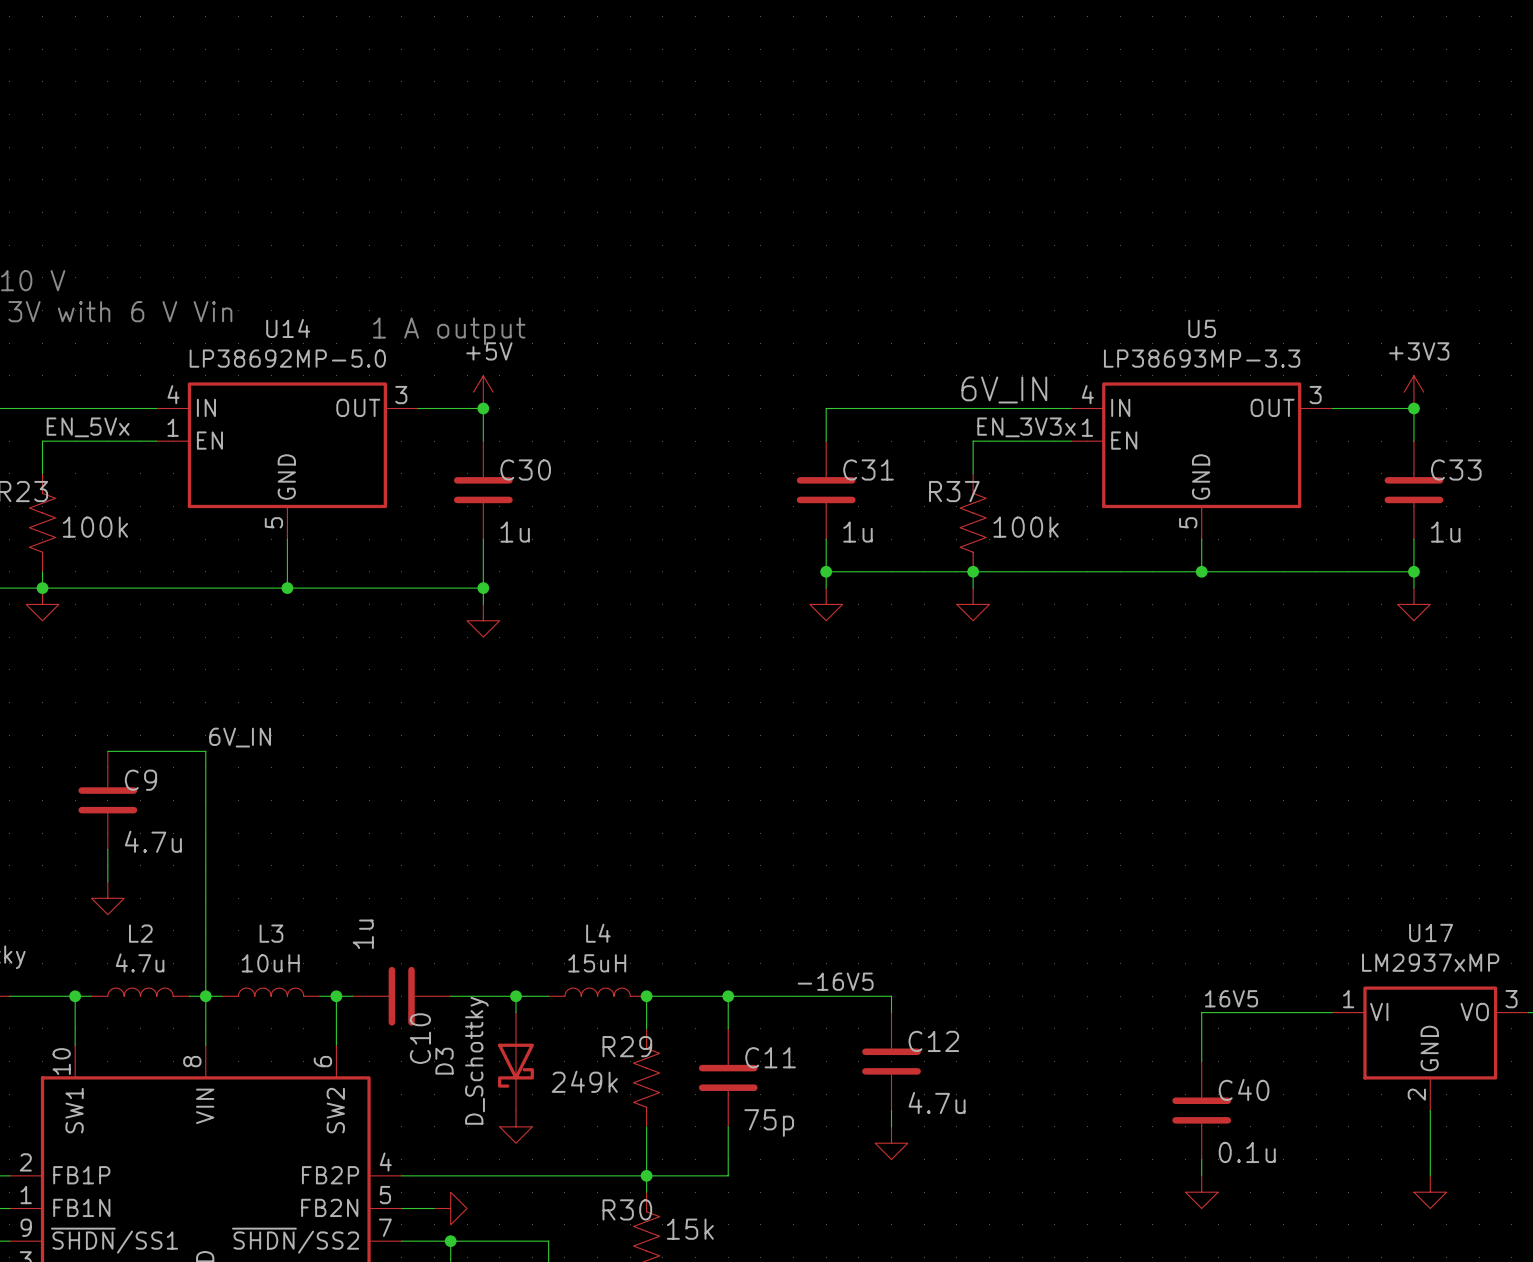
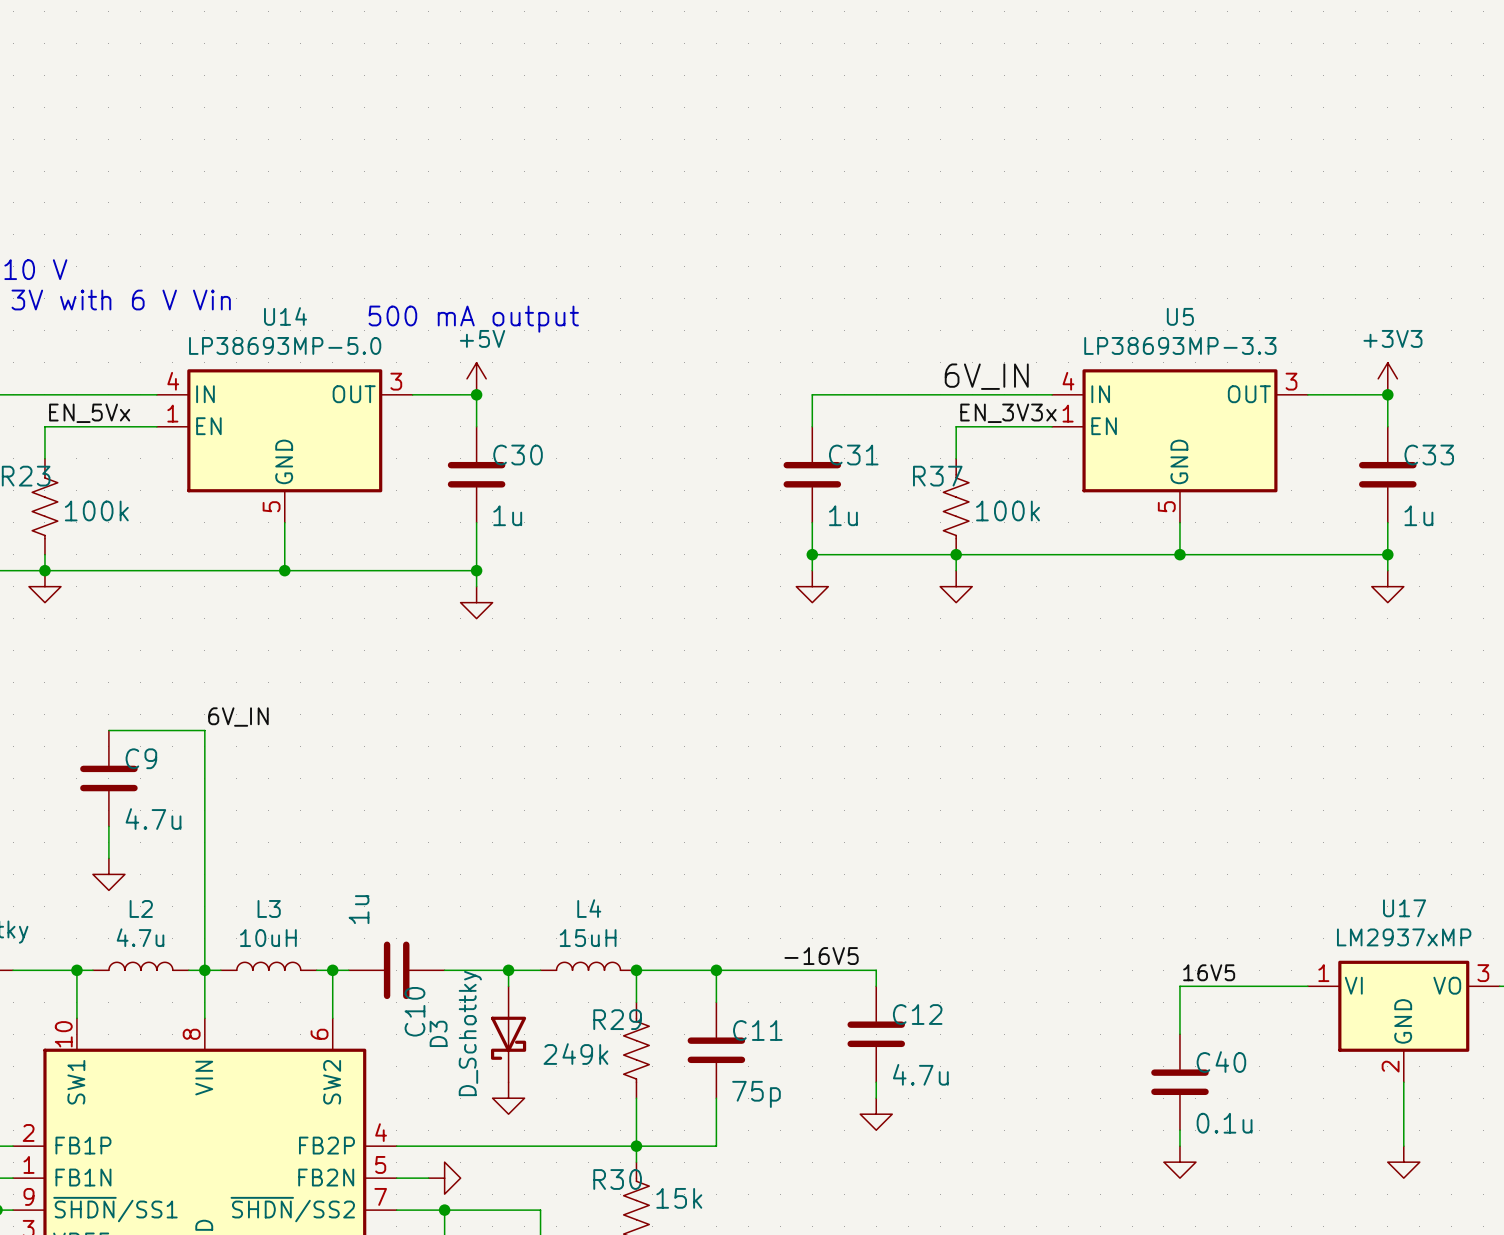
text: 1 A output (449, 331) -> 500 mA output (473, 319)
U14 value: LP38692MP-5.0 (287, 358) -> LP38693MP-5.0 (285, 345)

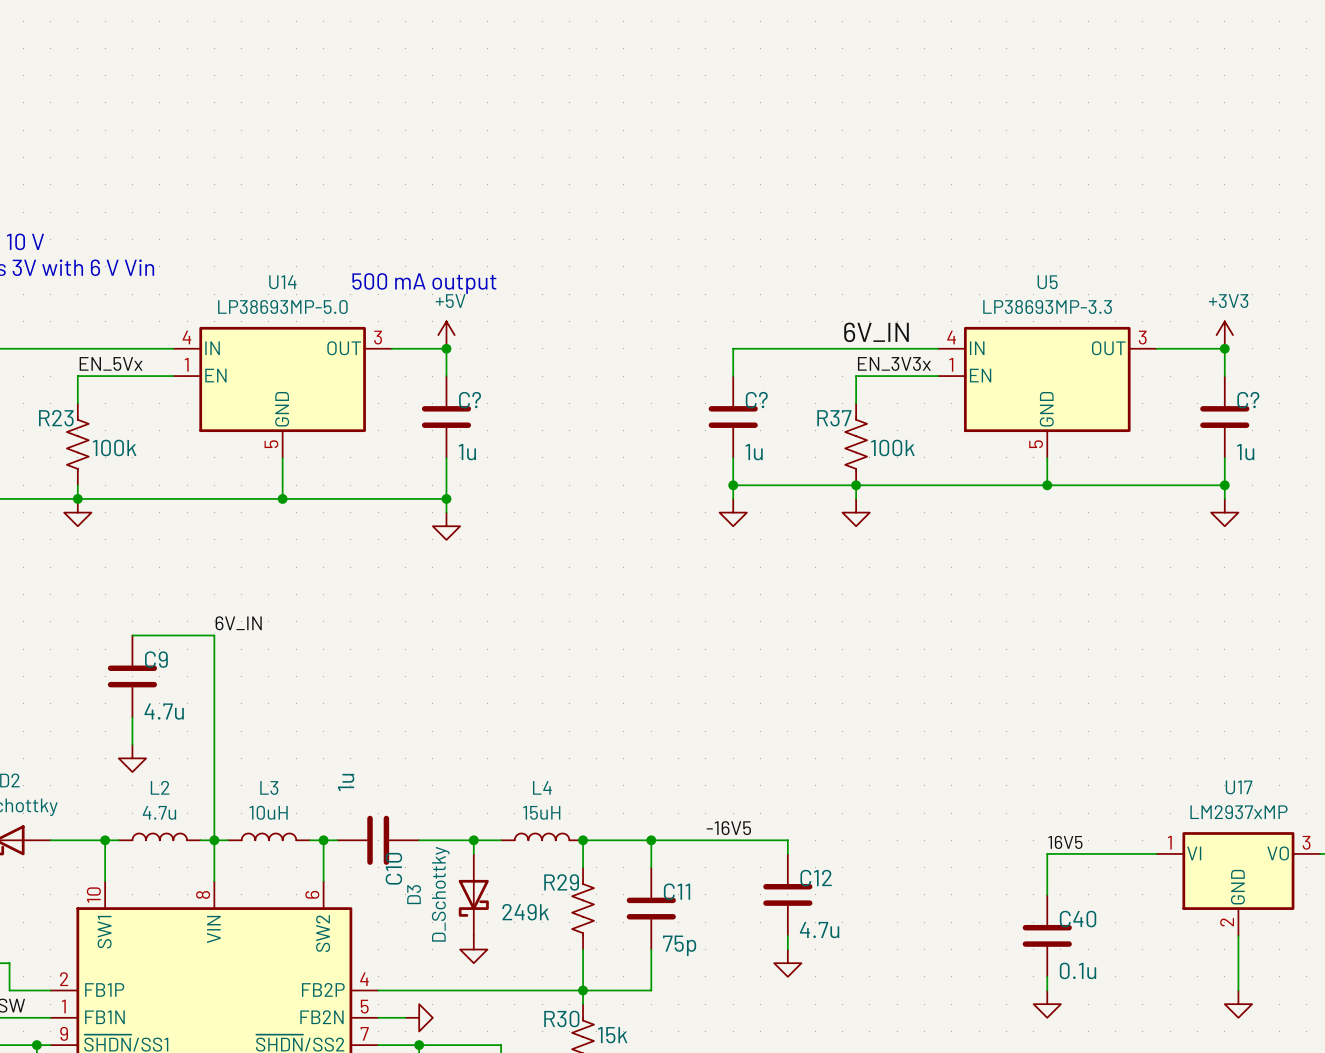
C30 name: C30 (518, 455) -> C? (470, 400)
C31 name: C31 (853, 455) -> C? (756, 400)
C33 name: C33 (1429, 455) -> C? (1248, 400)

